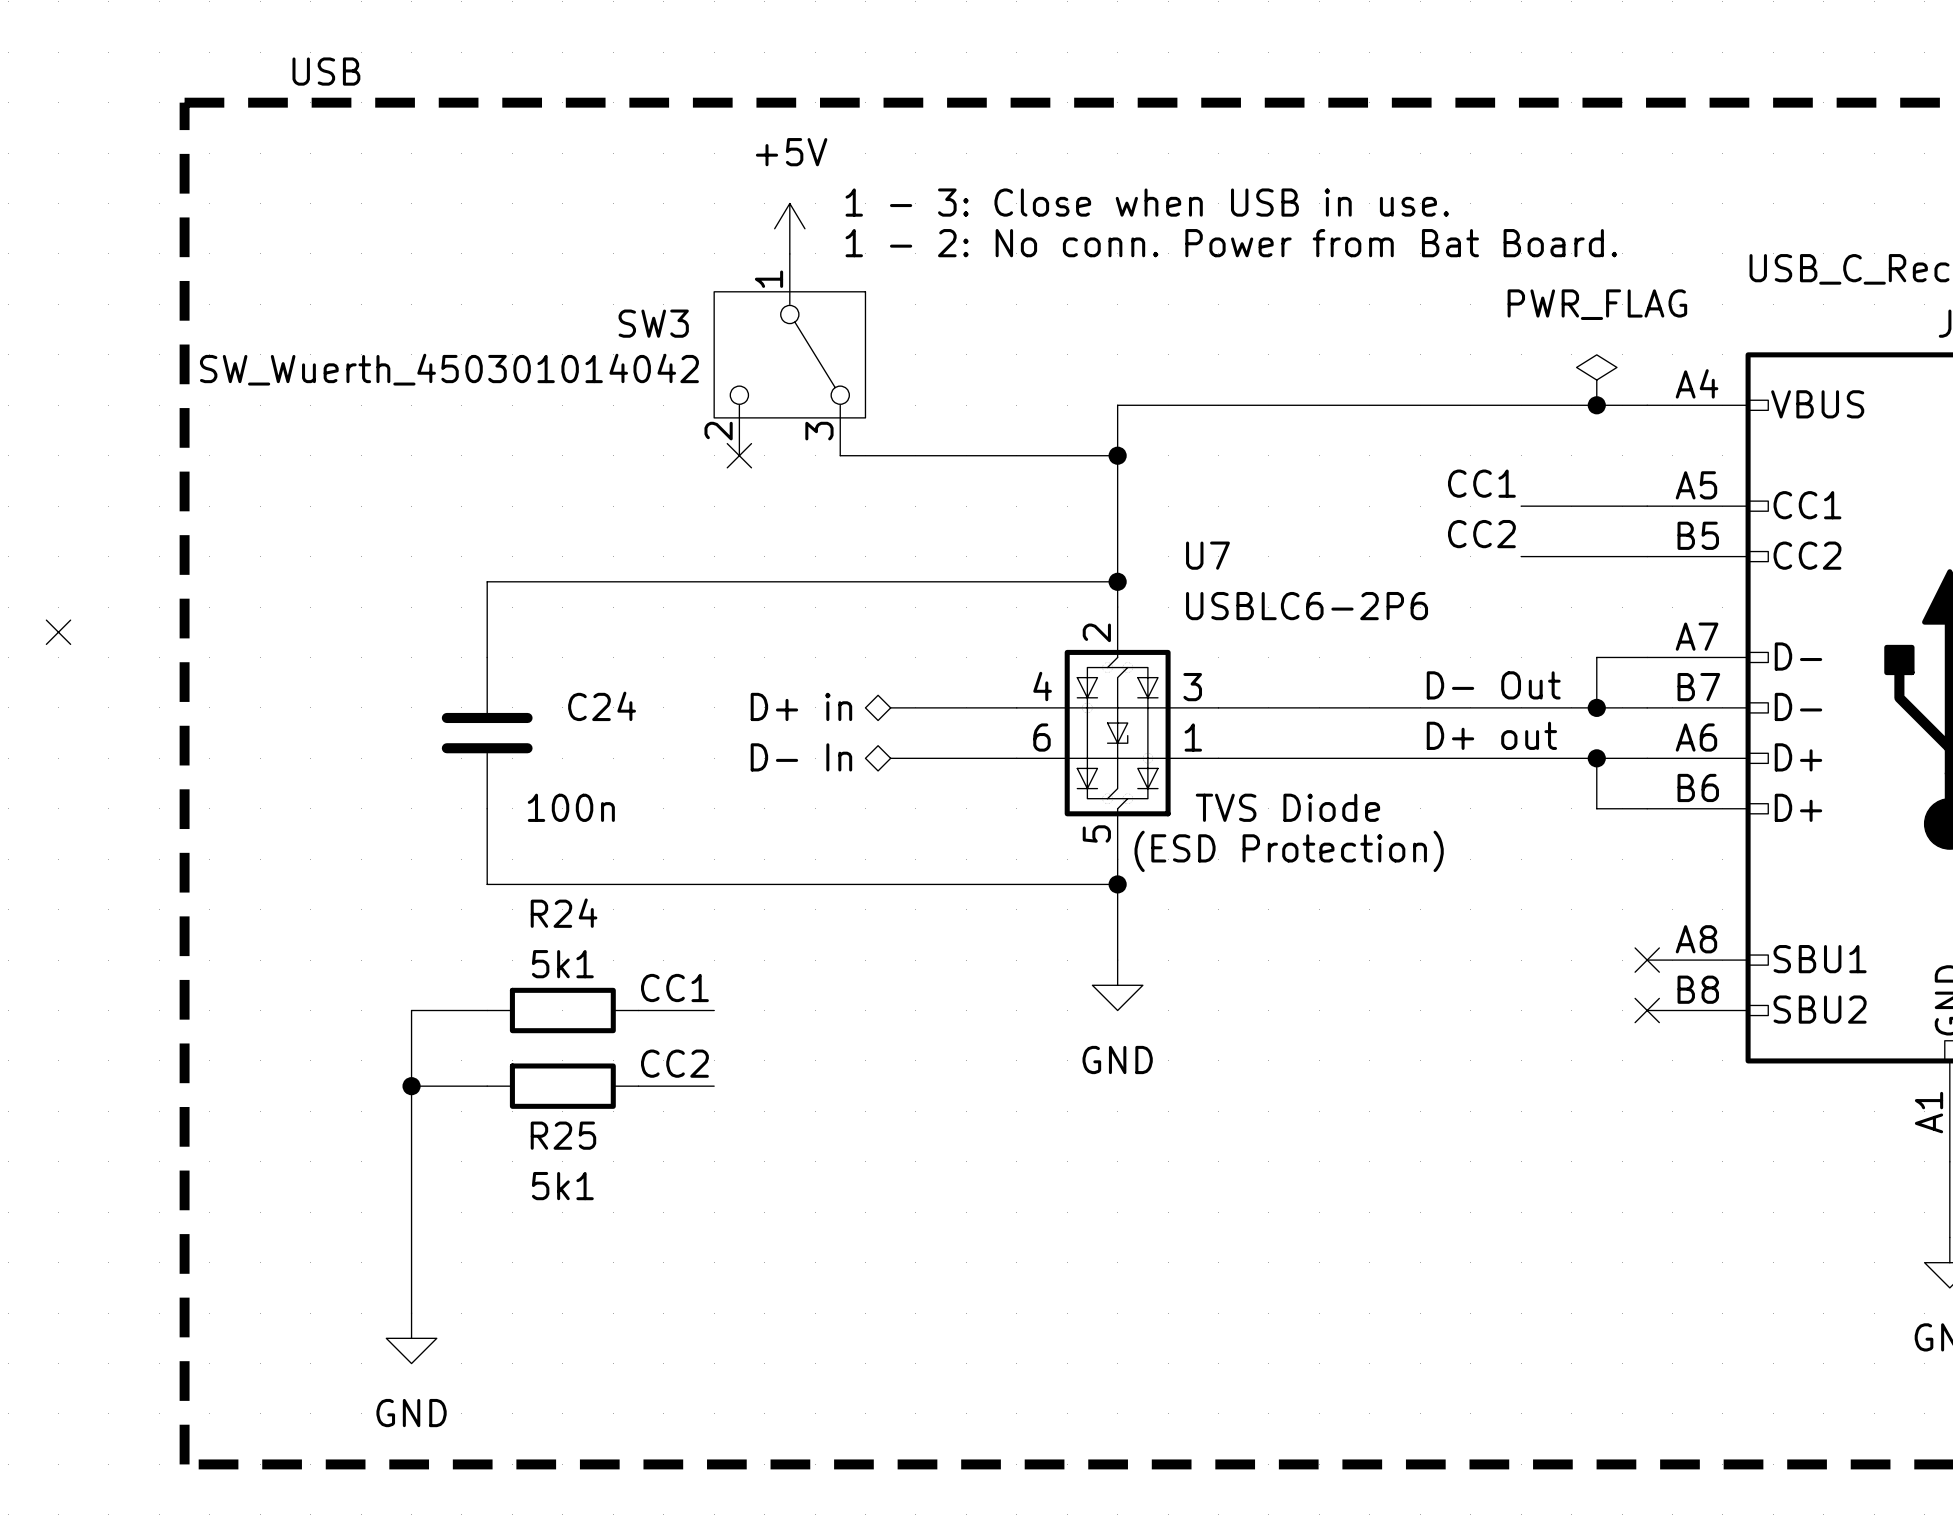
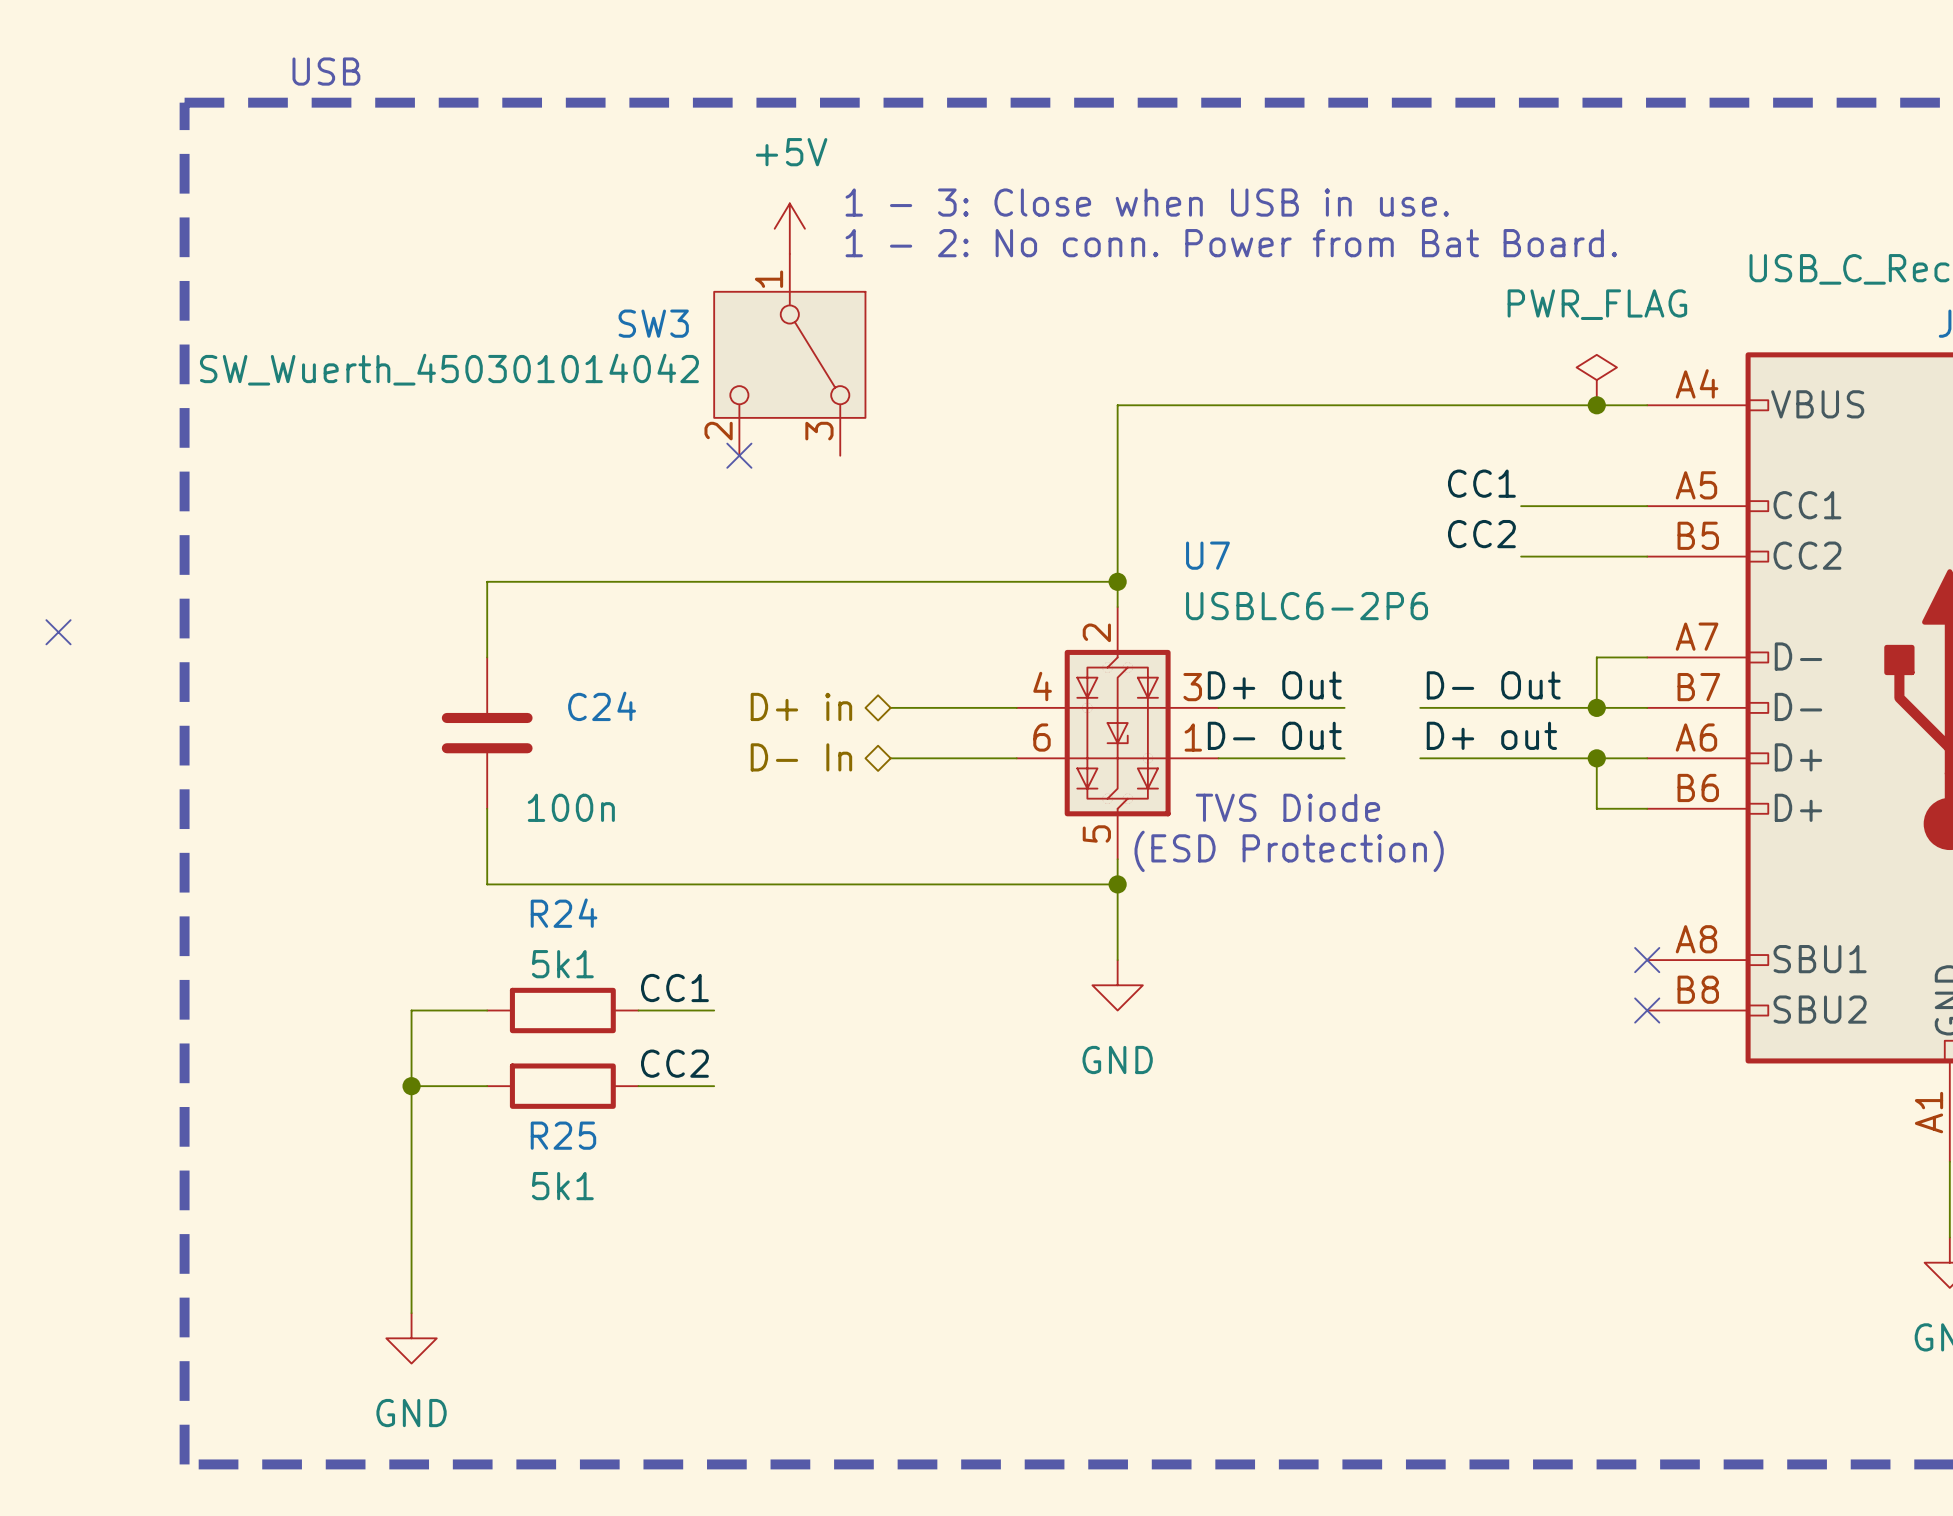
wire: (840, 455) (1117, 455) -> none
junction: (1117, 455) -> none
label: none -> D+ Out (1274, 685)
wire: (1344, 707) (1420, 707) -> none
label: none -> D- Out (1274, 735)
wire: (1344, 758) (1420, 758) -> none

